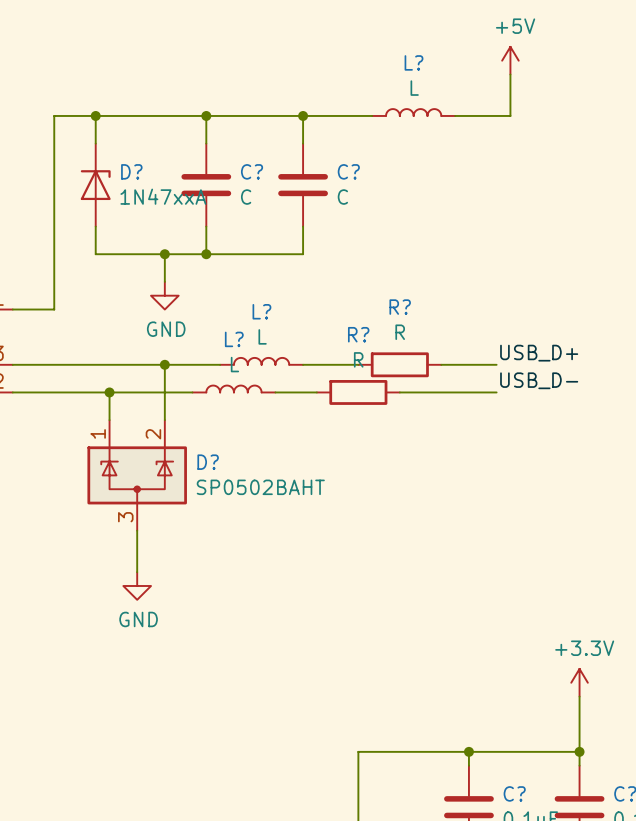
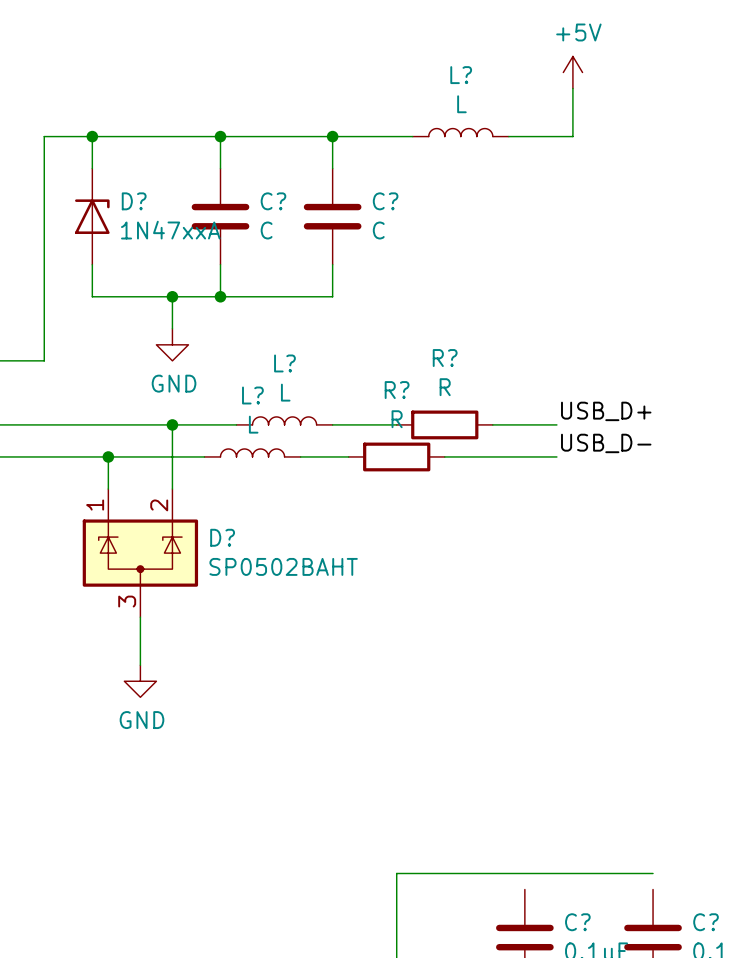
power symbol: +3.3V (579, 682) -> none
wire: (579, 696) (579, 765) -> none
wire: (468, 751) (468, 765) -> none
junction: (468, 751) -> none
junction: (579, 751) -> none

